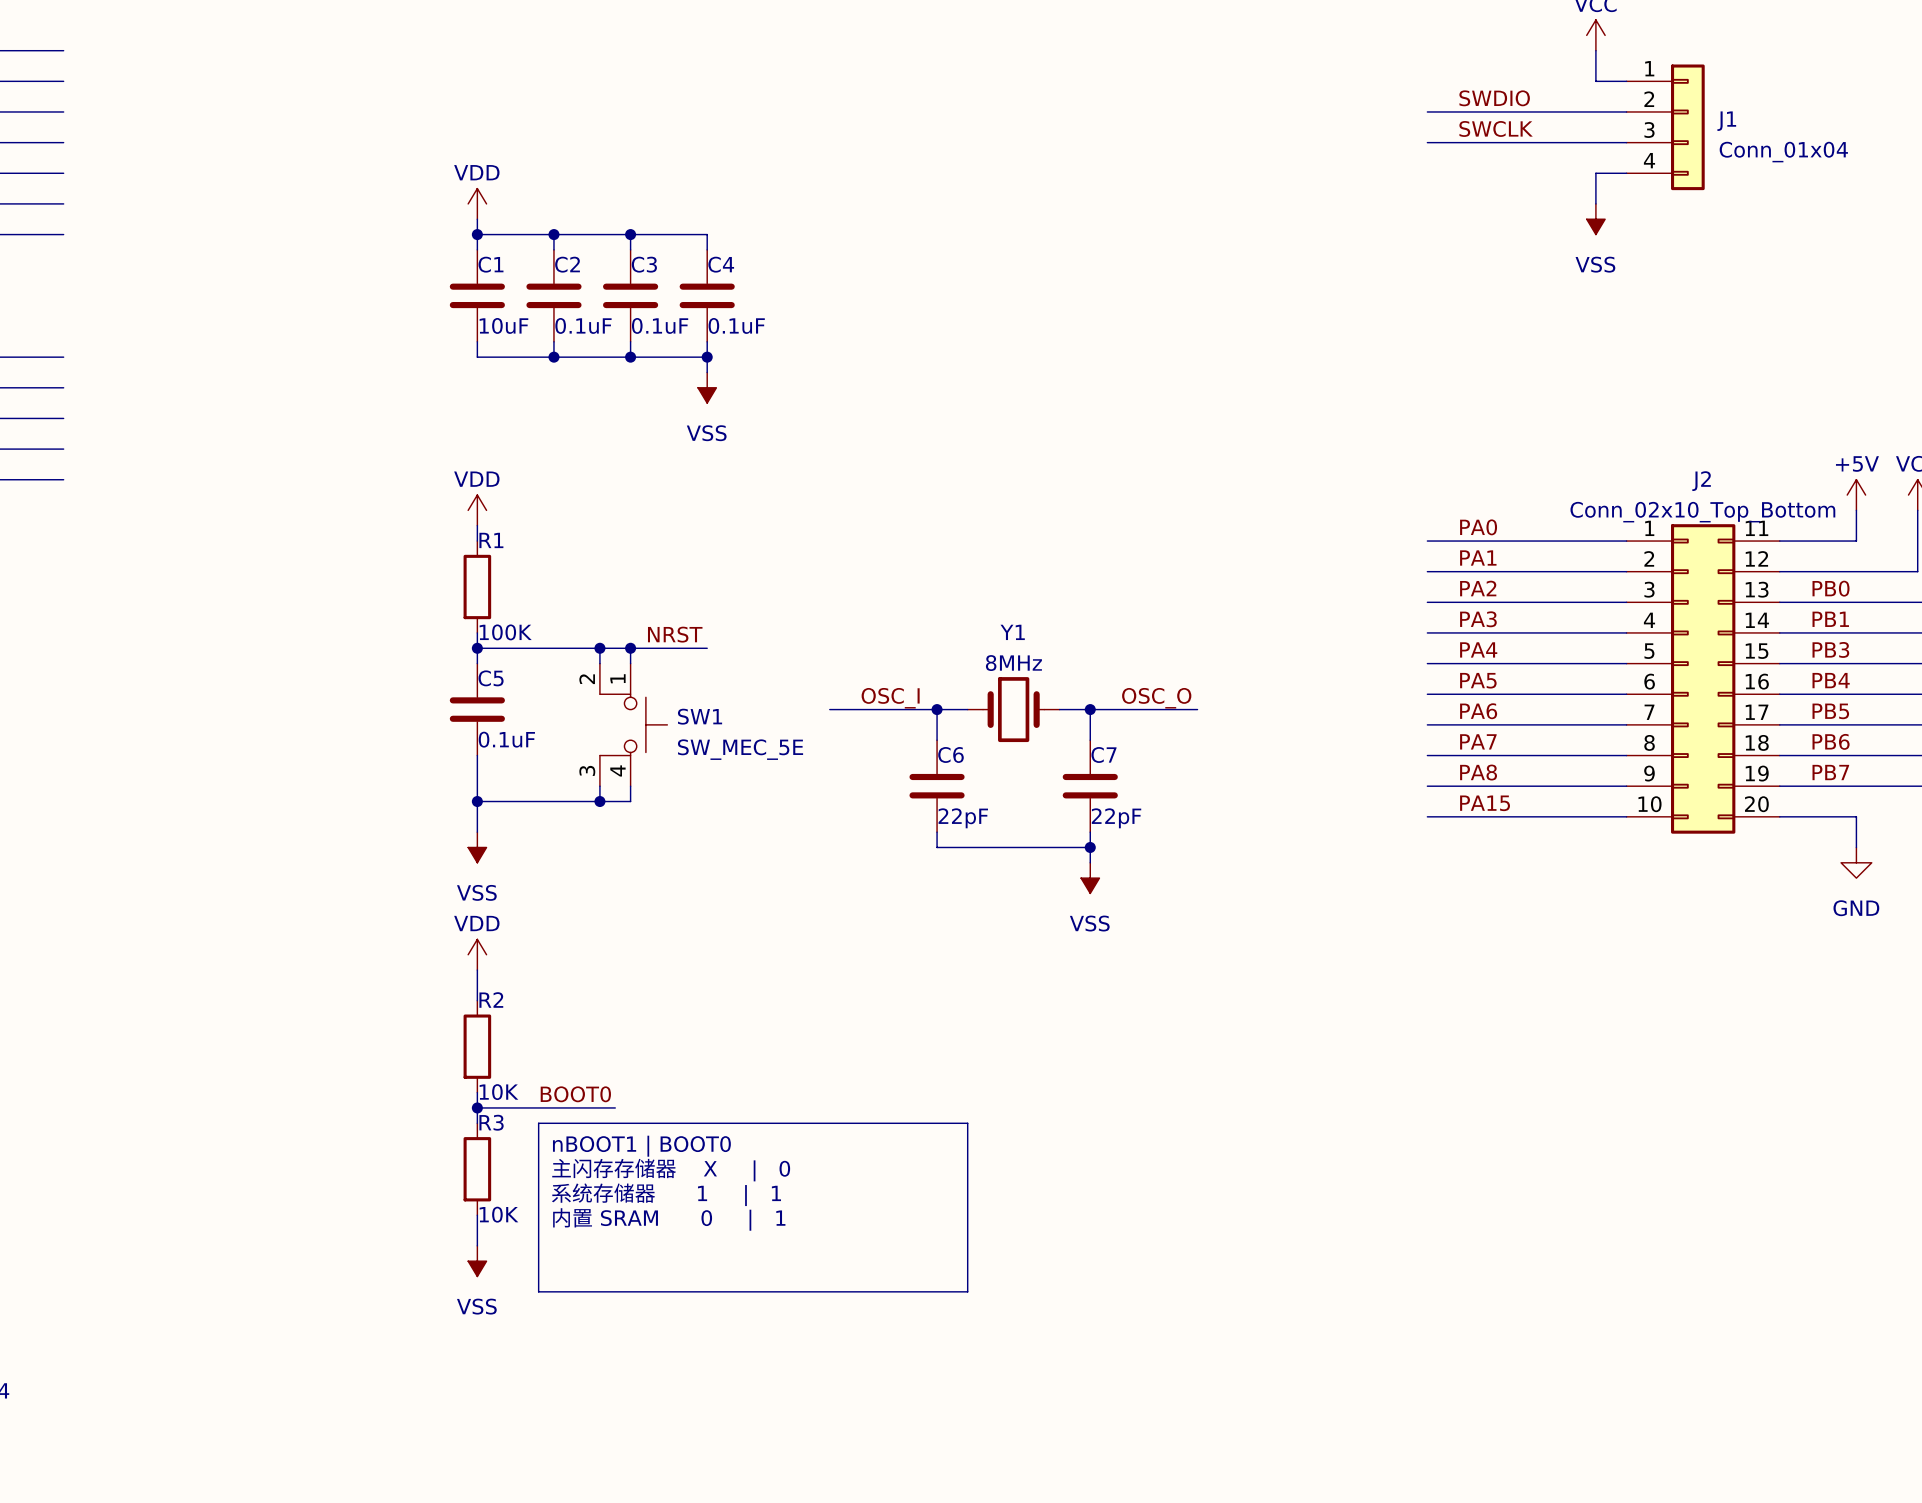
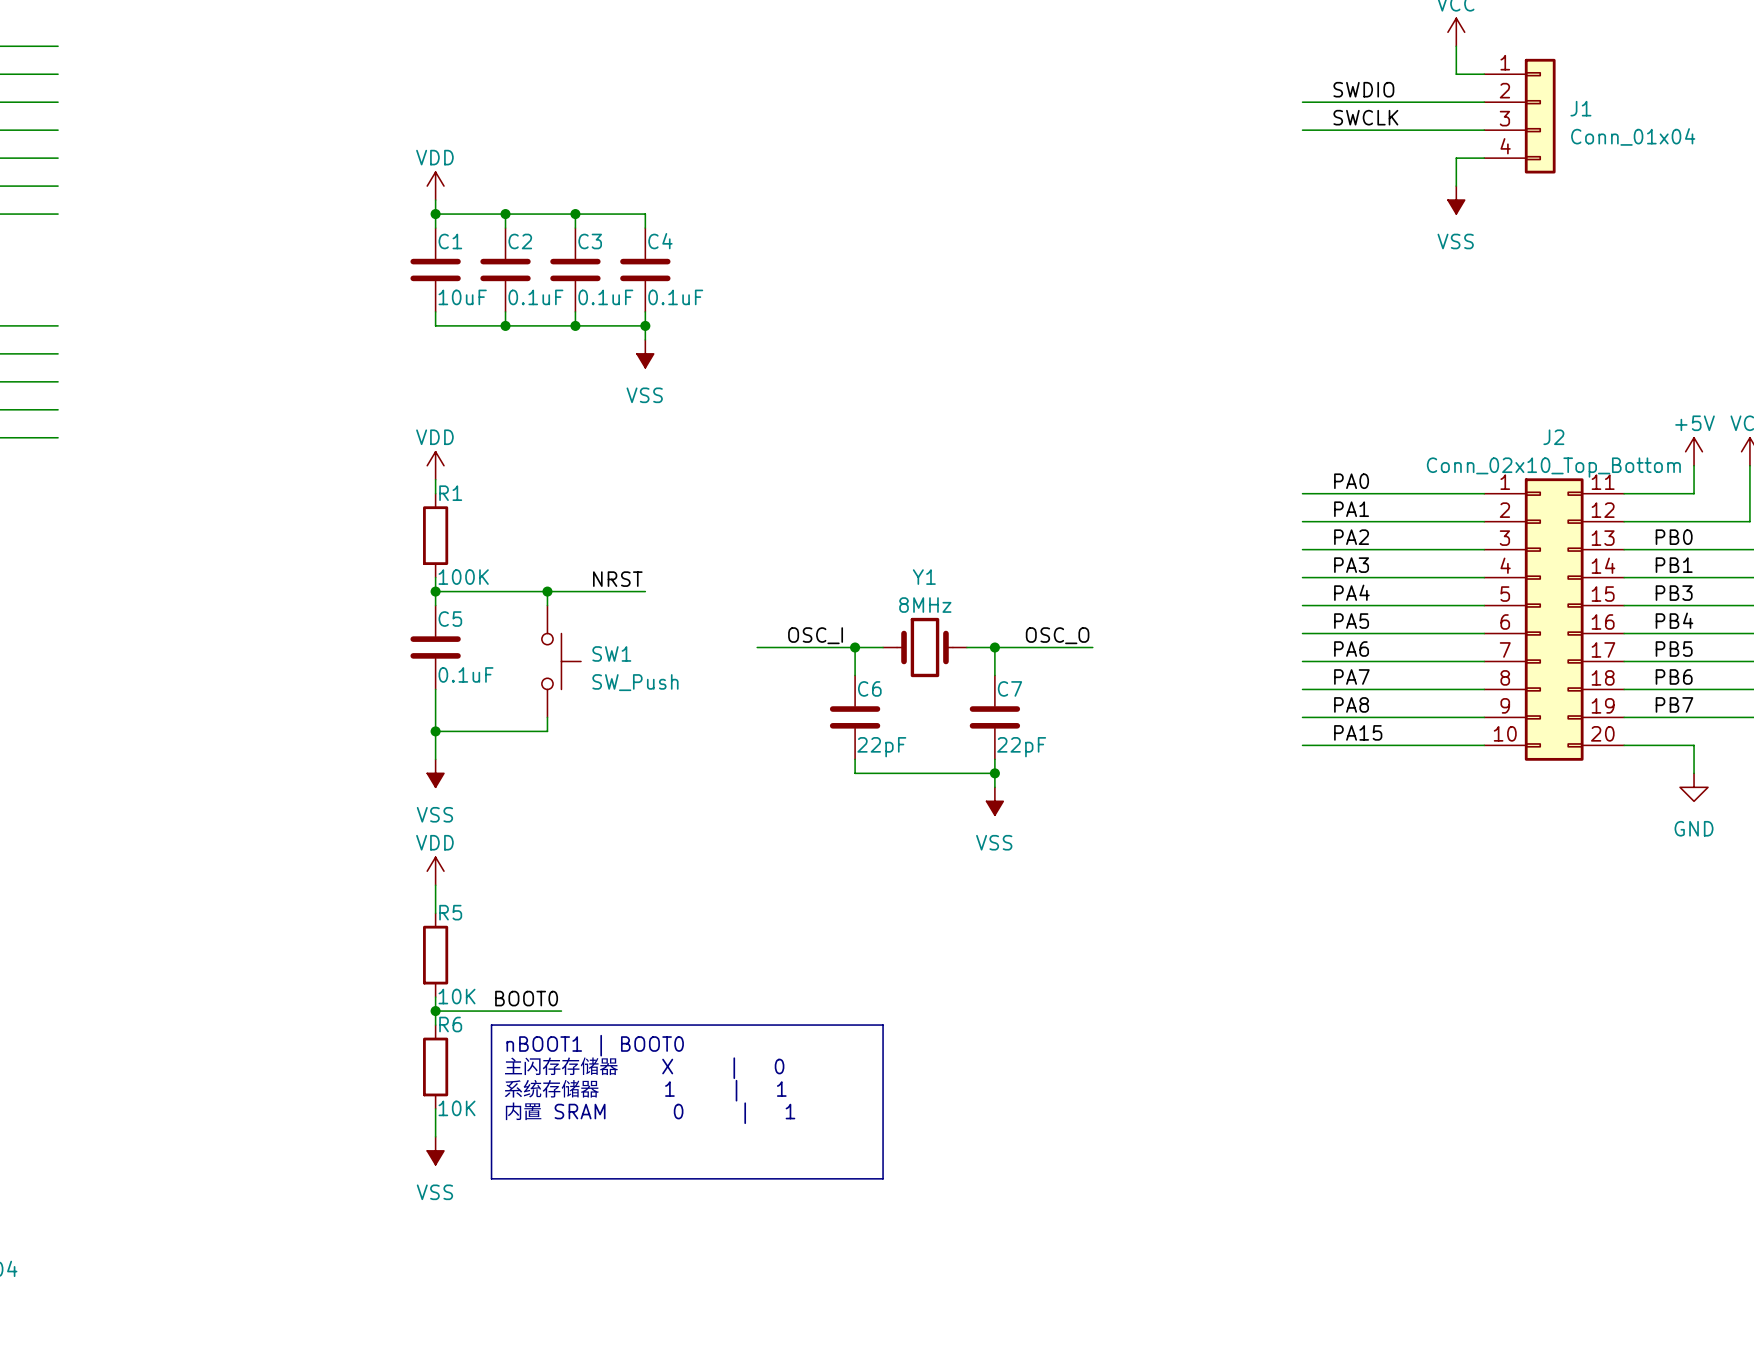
wire: (630, 648) (630, 663) -> none
junction: (630, 648) -> none
SW1 symbol: [599, 663, 668, 787] -> [541, 605, 582, 718]
SW1 value: SW_MEC_5E (740, 749) -> SW_Push (635, 682)
wire: (630, 786) (630, 801) (599, 801) -> none
junction: (599, 801) -> none
R2 name: R2 (491, 1000) -> R5 (450, 912)
R3 name: R3 (491, 1122) -> R6 (450, 1024)

